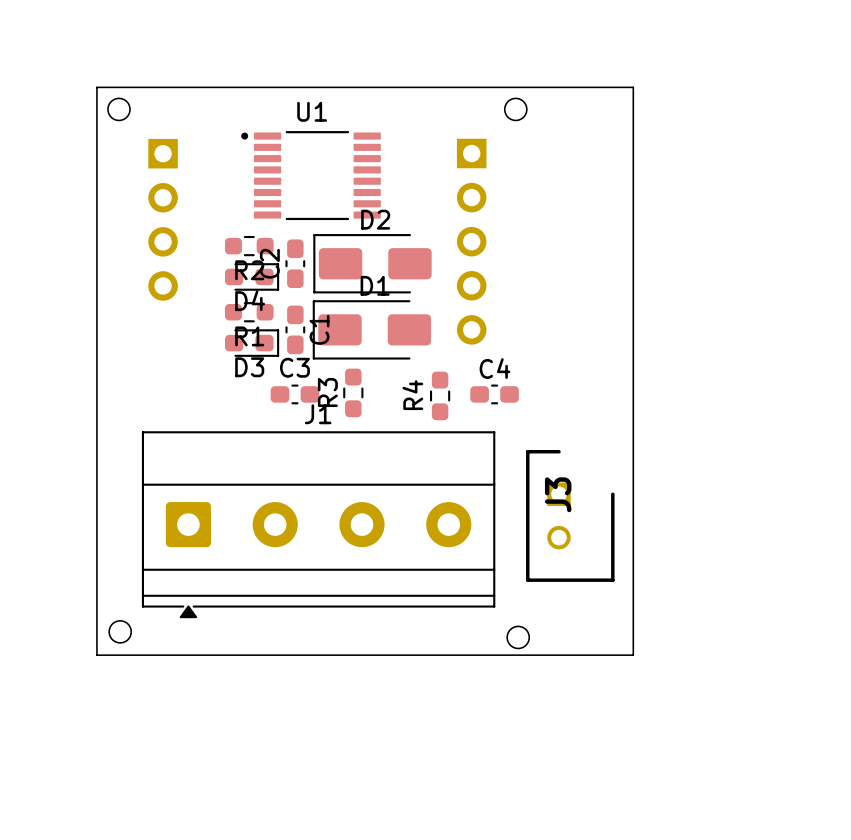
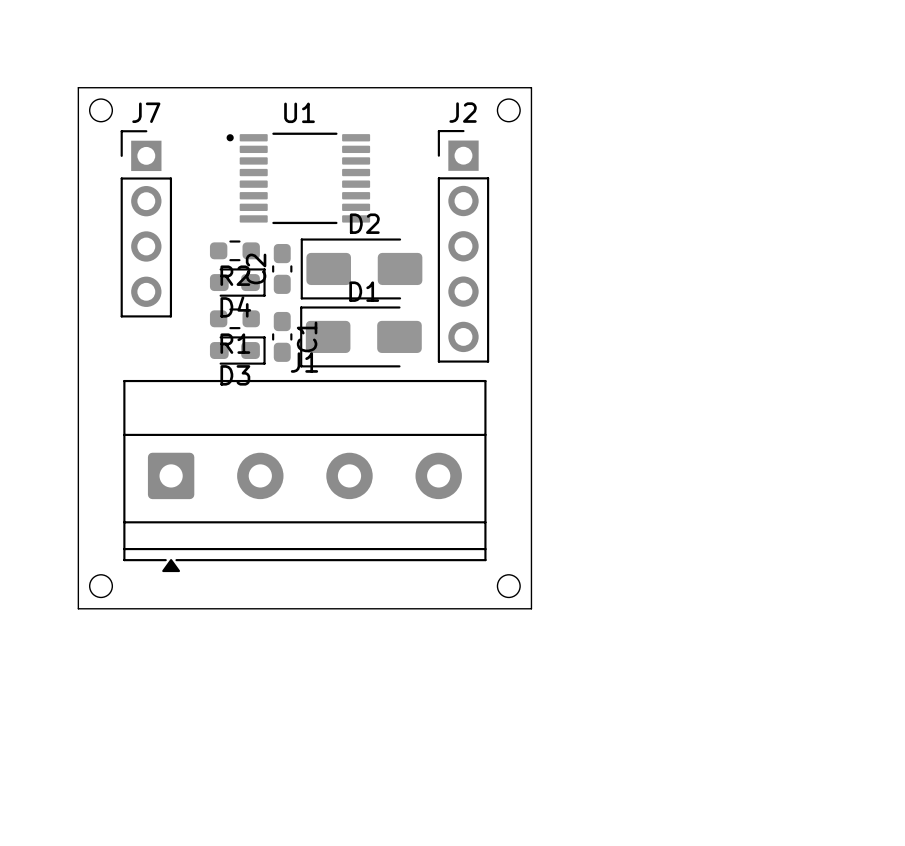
board edge: (537, 87) (633, 87) (633, 655) (96, 655) (96, 594) -> (531, 87) (531, 608) (78, 608)
J7 side: bottom (163, 219) -> top (146, 223)
J2 side: bottom (471, 241) -> top (463, 246)
R3: (353, 392) -> none
C3: (294, 394) -> none
C4: (494, 394) -> none
R4: (440, 395) -> none
J3: (570, 515) -> none
J1 position: (318, 524) -> (304, 476)
round board edge position: (120, 631) -> (101, 586)
round board edge position: (518, 637) -> (508, 586)

